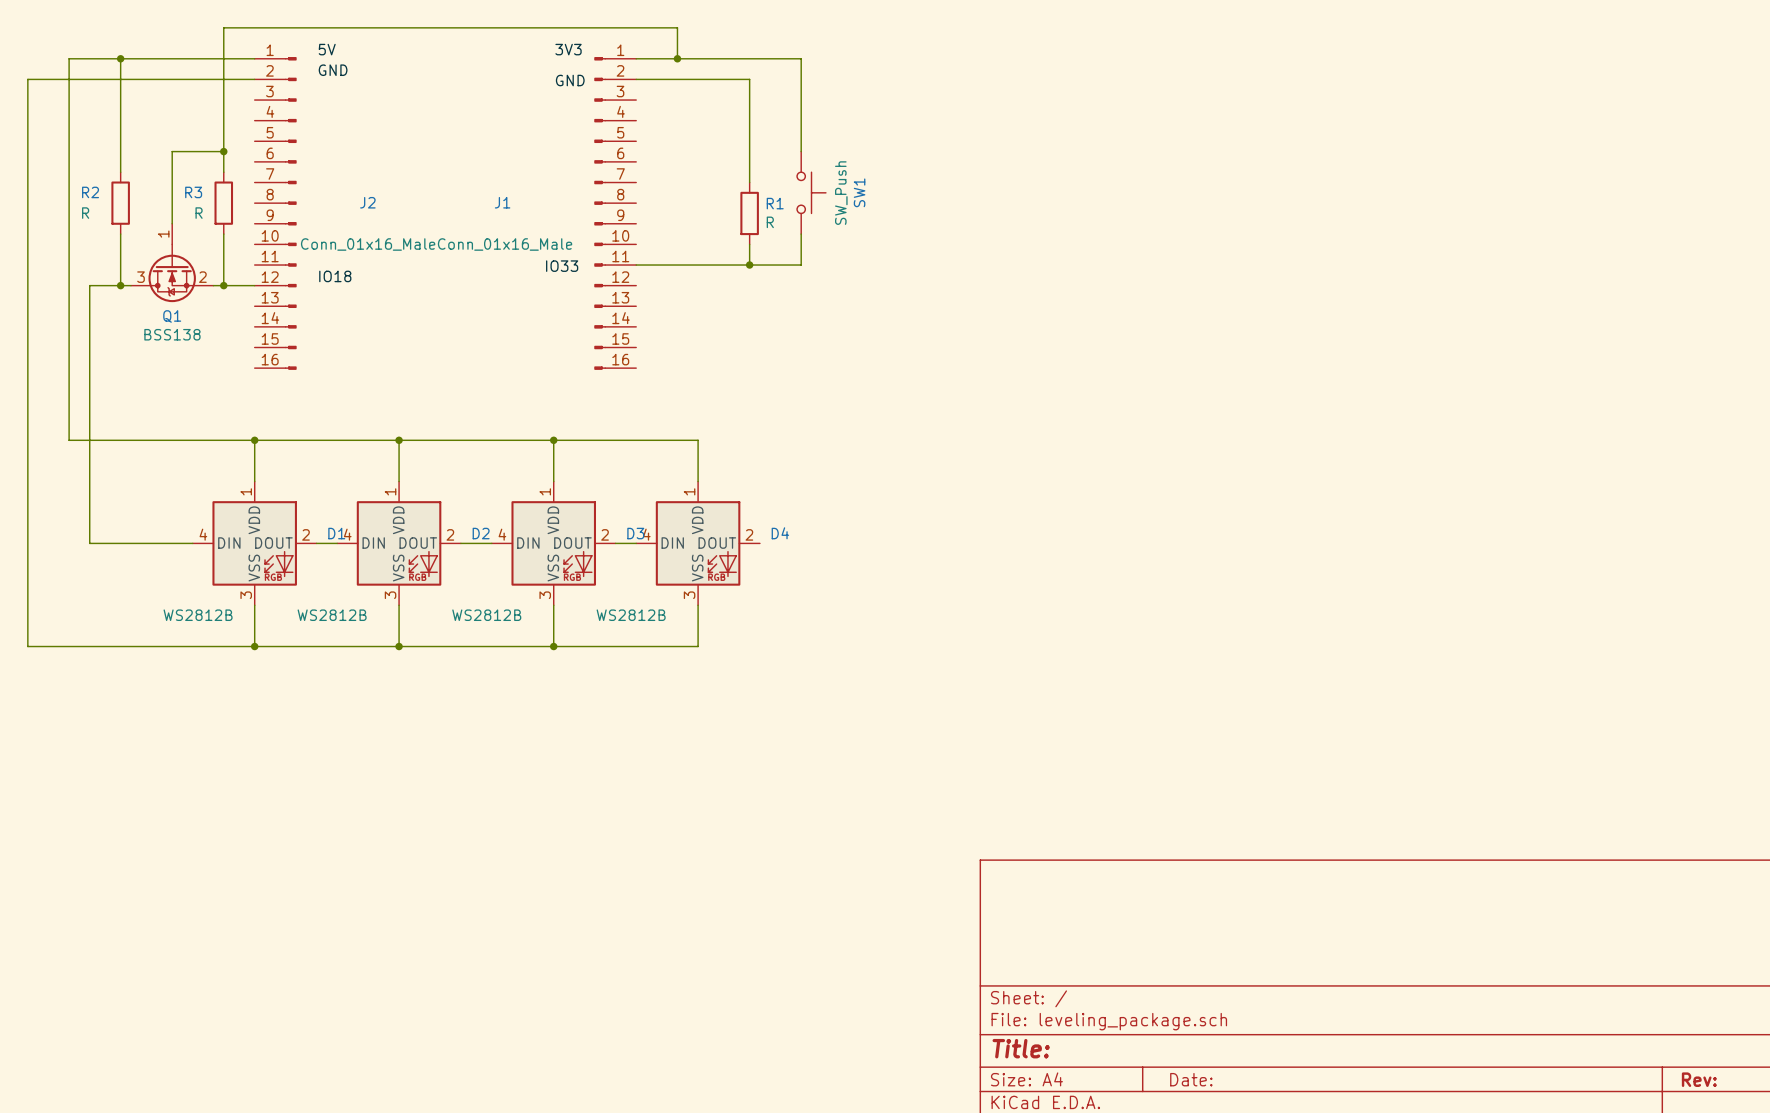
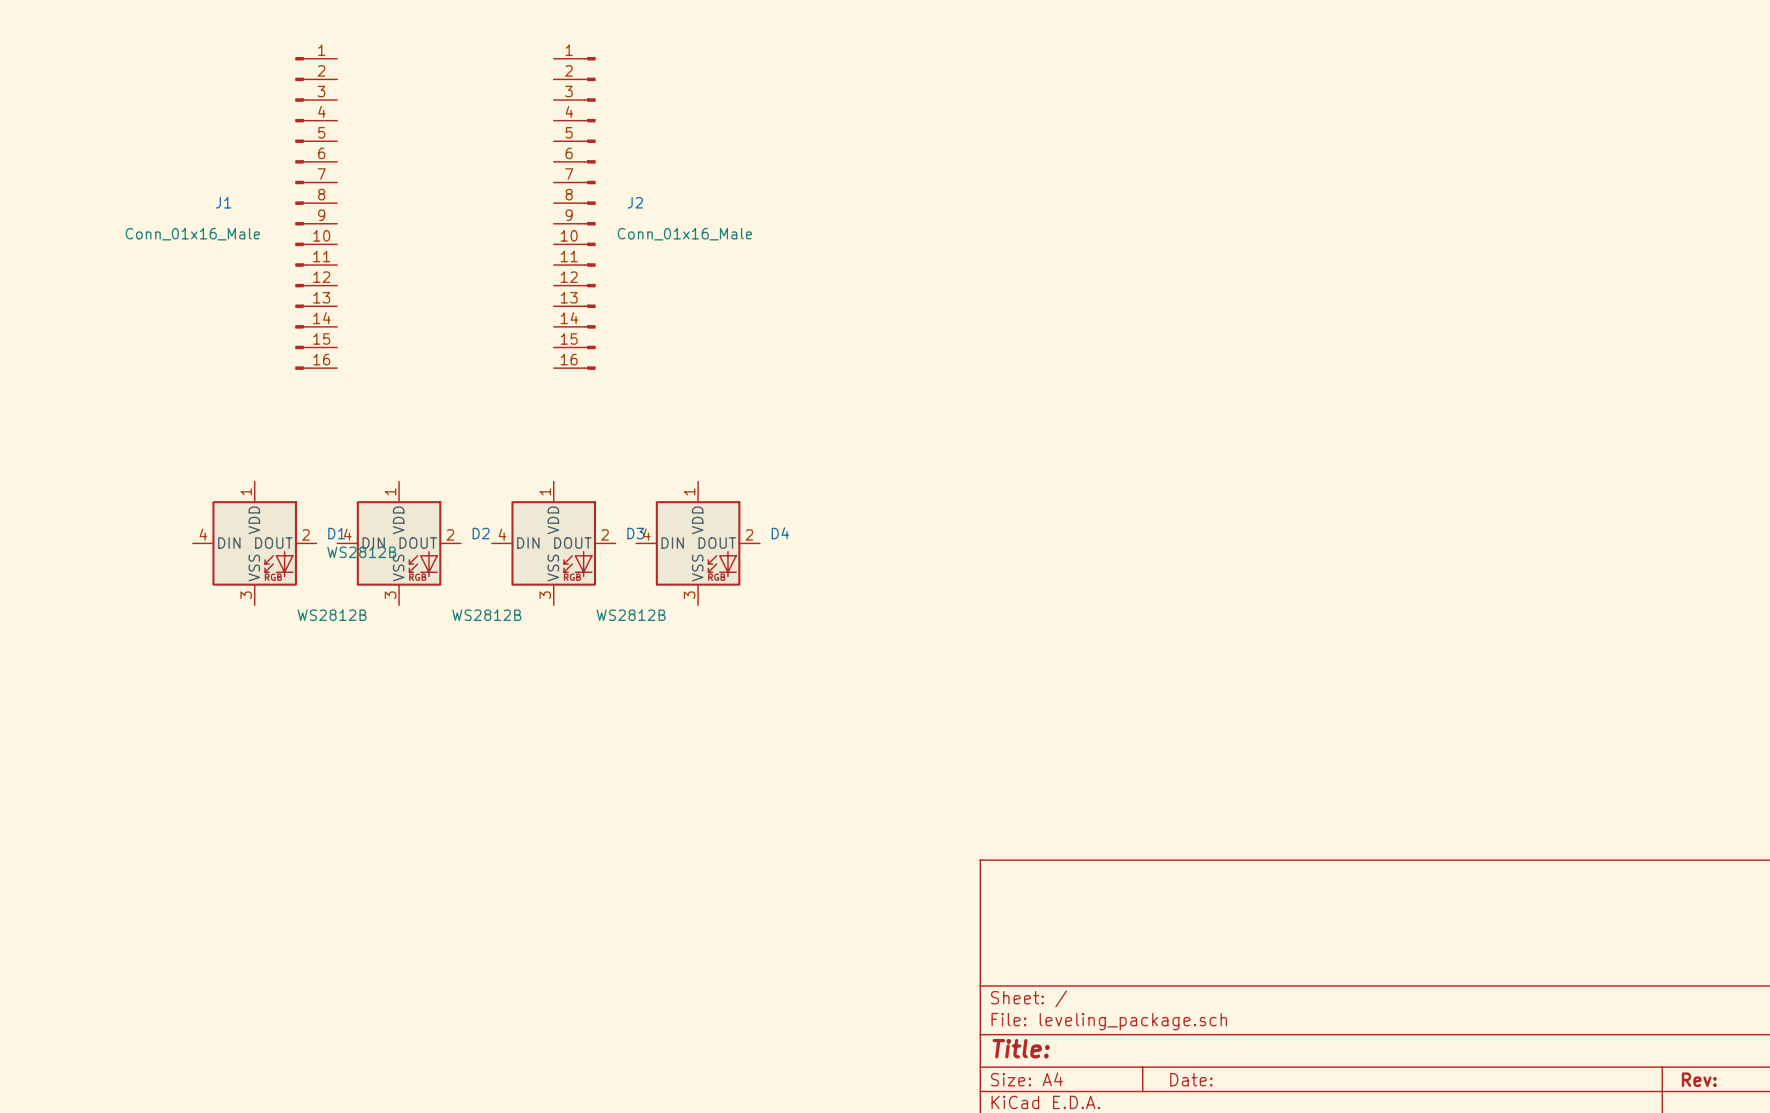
label: 5V (327, 49) -> none
label: 3V3 (568, 49) -> none
wire: (120, 58) (120, 172) -> none
junction: (120, 58) -> none
wire: (254, 58) (69, 58) (69, 440) (698, 440) (698, 481) -> none
wire: (636, 58) (801, 58) (801, 151) -> none
wire: (677, 58) (677, 27) (223, 27) (223, 172) -> none
junction: (677, 58) -> none
label: GND (333, 70) -> none
wire: (254, 79) (27, 79) (27, 646) (698, 646) (698, 605) -> none
wire: (636, 79) (749, 79) (749, 182) -> none
label: GND (570, 80) -> none
wire: (223, 151) (172, 151) (172, 223) -> none
junction: (223, 151) -> none
SW1: SW_Push (811, 192) -> none
J2 name position: J2 (367, 202) -> J2 (635, 202)
J1 name position: J1 (502, 202) -> J1 (223, 202)
R2: R (120, 203) -> none
R3: R (223, 203) -> none
J2 position: (275, 213) -> (574, 213)
J1 position: (615, 213) -> (316, 213)
R1: R (749, 213) -> none
wire: (120, 234) (120, 285) -> none
wire: (223, 234) (223, 285) -> none
wire: (801, 234) (801, 265) (636, 265) -> none
J2 value position: Conn_01x16_Male (368, 244) -> Conn_01x16_Male (684, 234)
J1 value position: Conn_01x16_Male (505, 244) -> Conn_01x16_Male (192, 234)
wire: (749, 244) (749, 265) -> none
Q1: BSS138 (172, 262) -> none
junction: (749, 265) -> none
label: IO33 (562, 266) -> none
label: IO18 (335, 276) -> none
junction: (120, 285) -> none
wire: (130, 285) (89, 285) (89, 543) (192, 543) -> none
wire: (213, 285) (254, 285) -> none
junction: (223, 285) -> none
wire: (254, 440) (254, 481) -> none
junction: (254, 440) -> none
wire: (399, 440) (399, 481) -> none
junction: (399, 440) -> none
wire: (553, 440) (553, 481) -> none
junction: (553, 440) -> none
wire: (316, 543) (337, 543) -> none
wire: (460, 543) (491, 543) -> none
wire: (615, 543) (636, 543) -> none
wire: (254, 605) (254, 646) -> none
wire: (399, 605) (399, 646) -> none
wire: (553, 605) (553, 646) -> none
D1 value position: WS2812B (198, 615) -> WS2812B (361, 552)
junction: (254, 646) -> none
junction: (399, 646) -> none
junction: (553, 646) -> none

